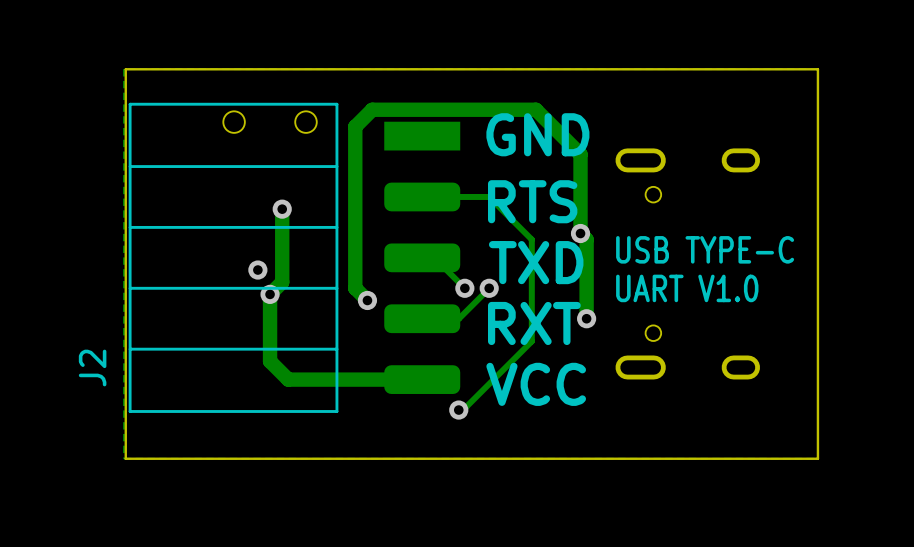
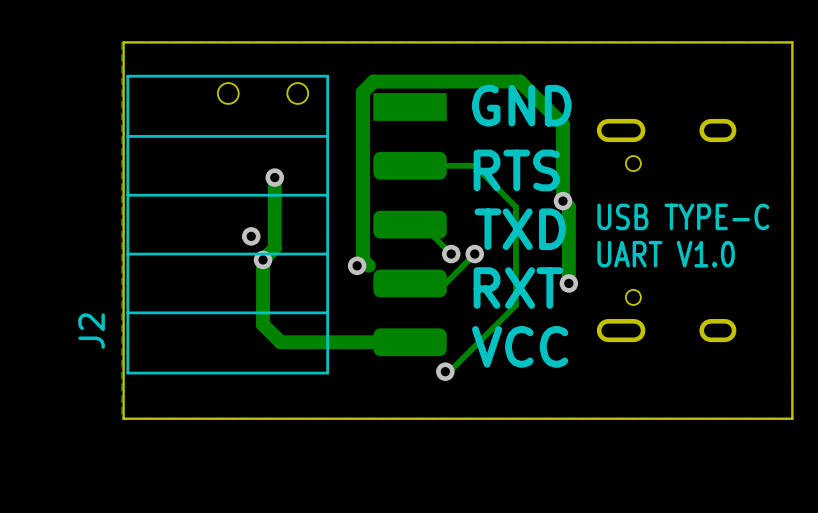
track: (384, 109) (372, 109) (355, 126) (355, 288) (367, 300) -> (373, 81) (363, 92) (363, 259) (368, 265)

